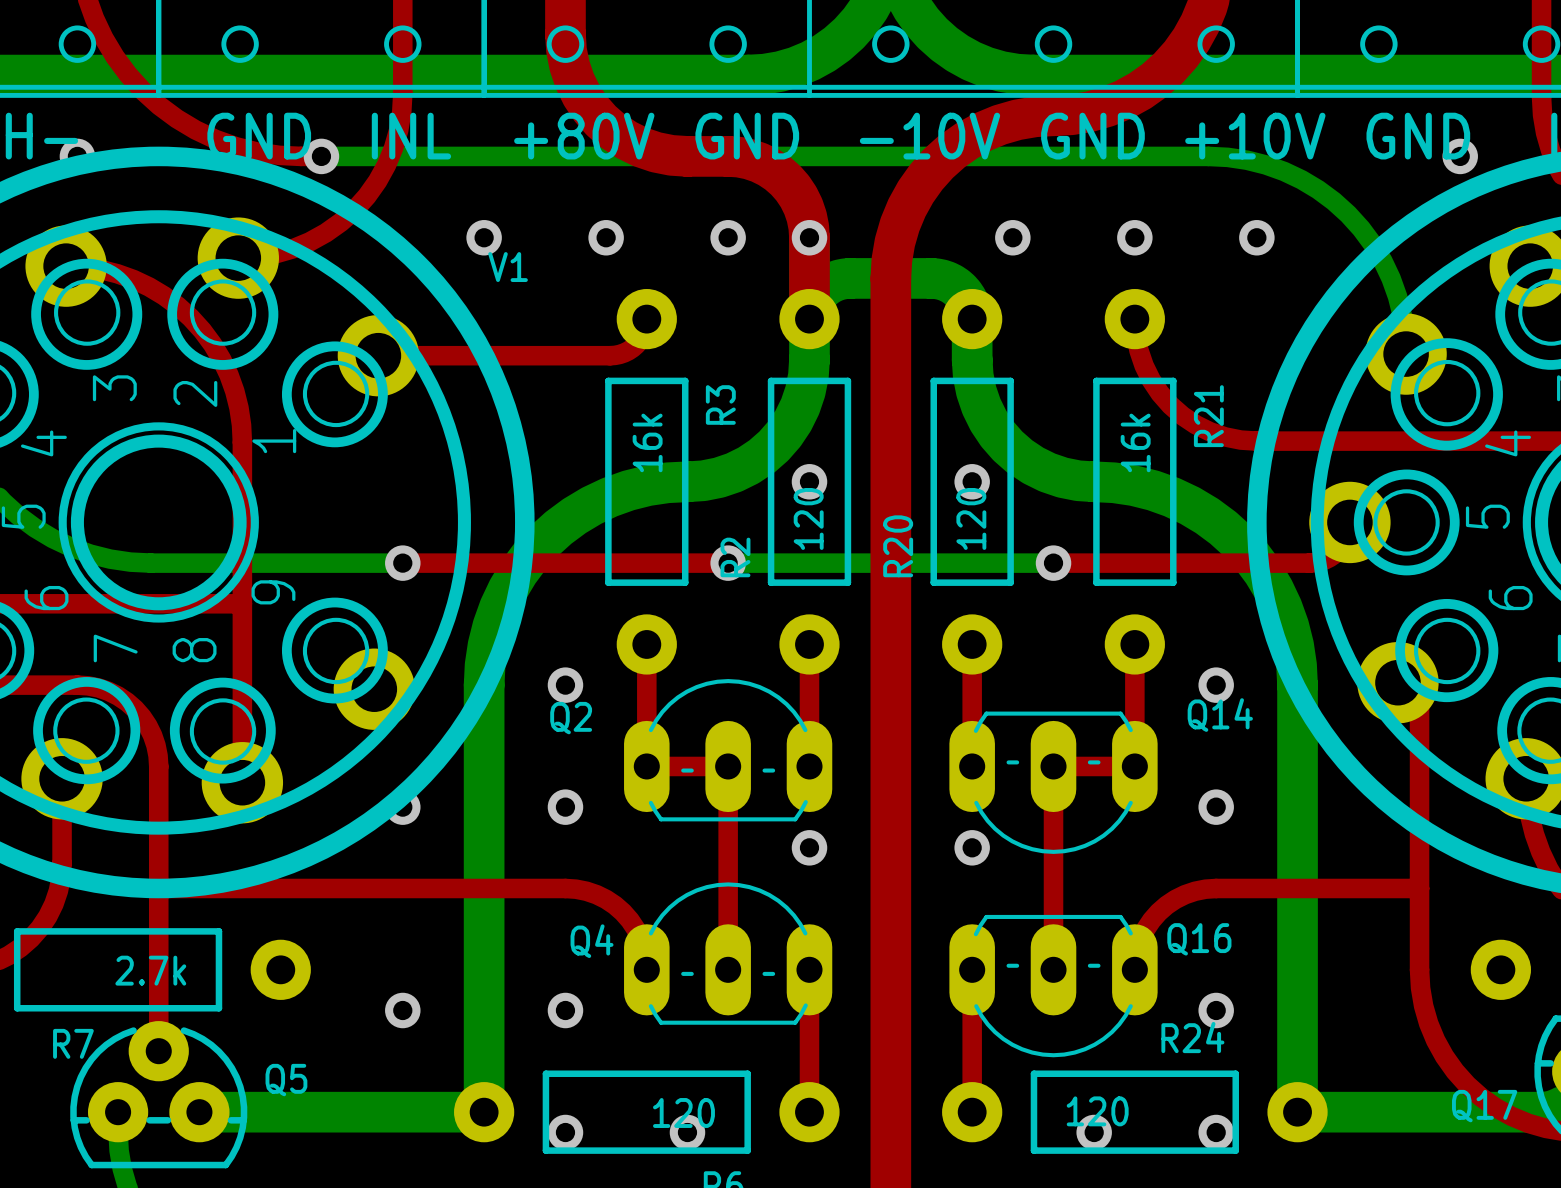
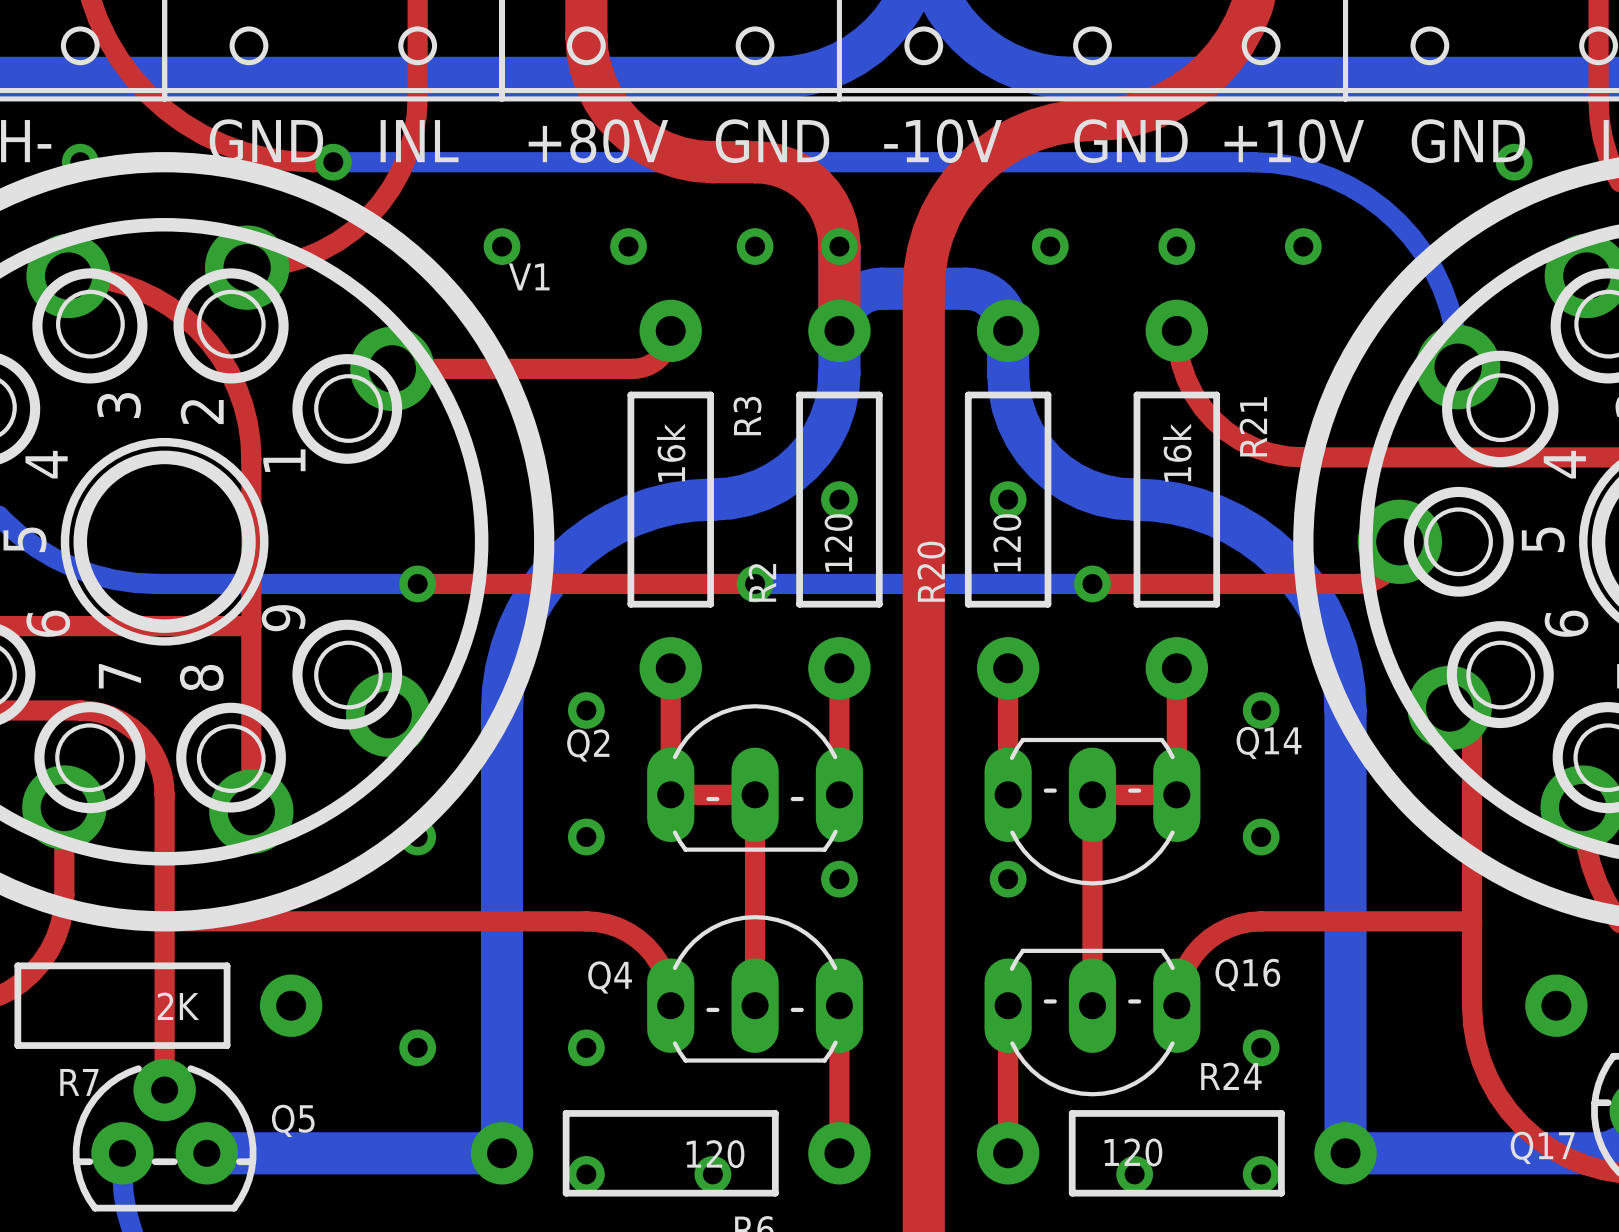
R7 value: 2.7k (150, 970) -> 2K (178, 1006)

